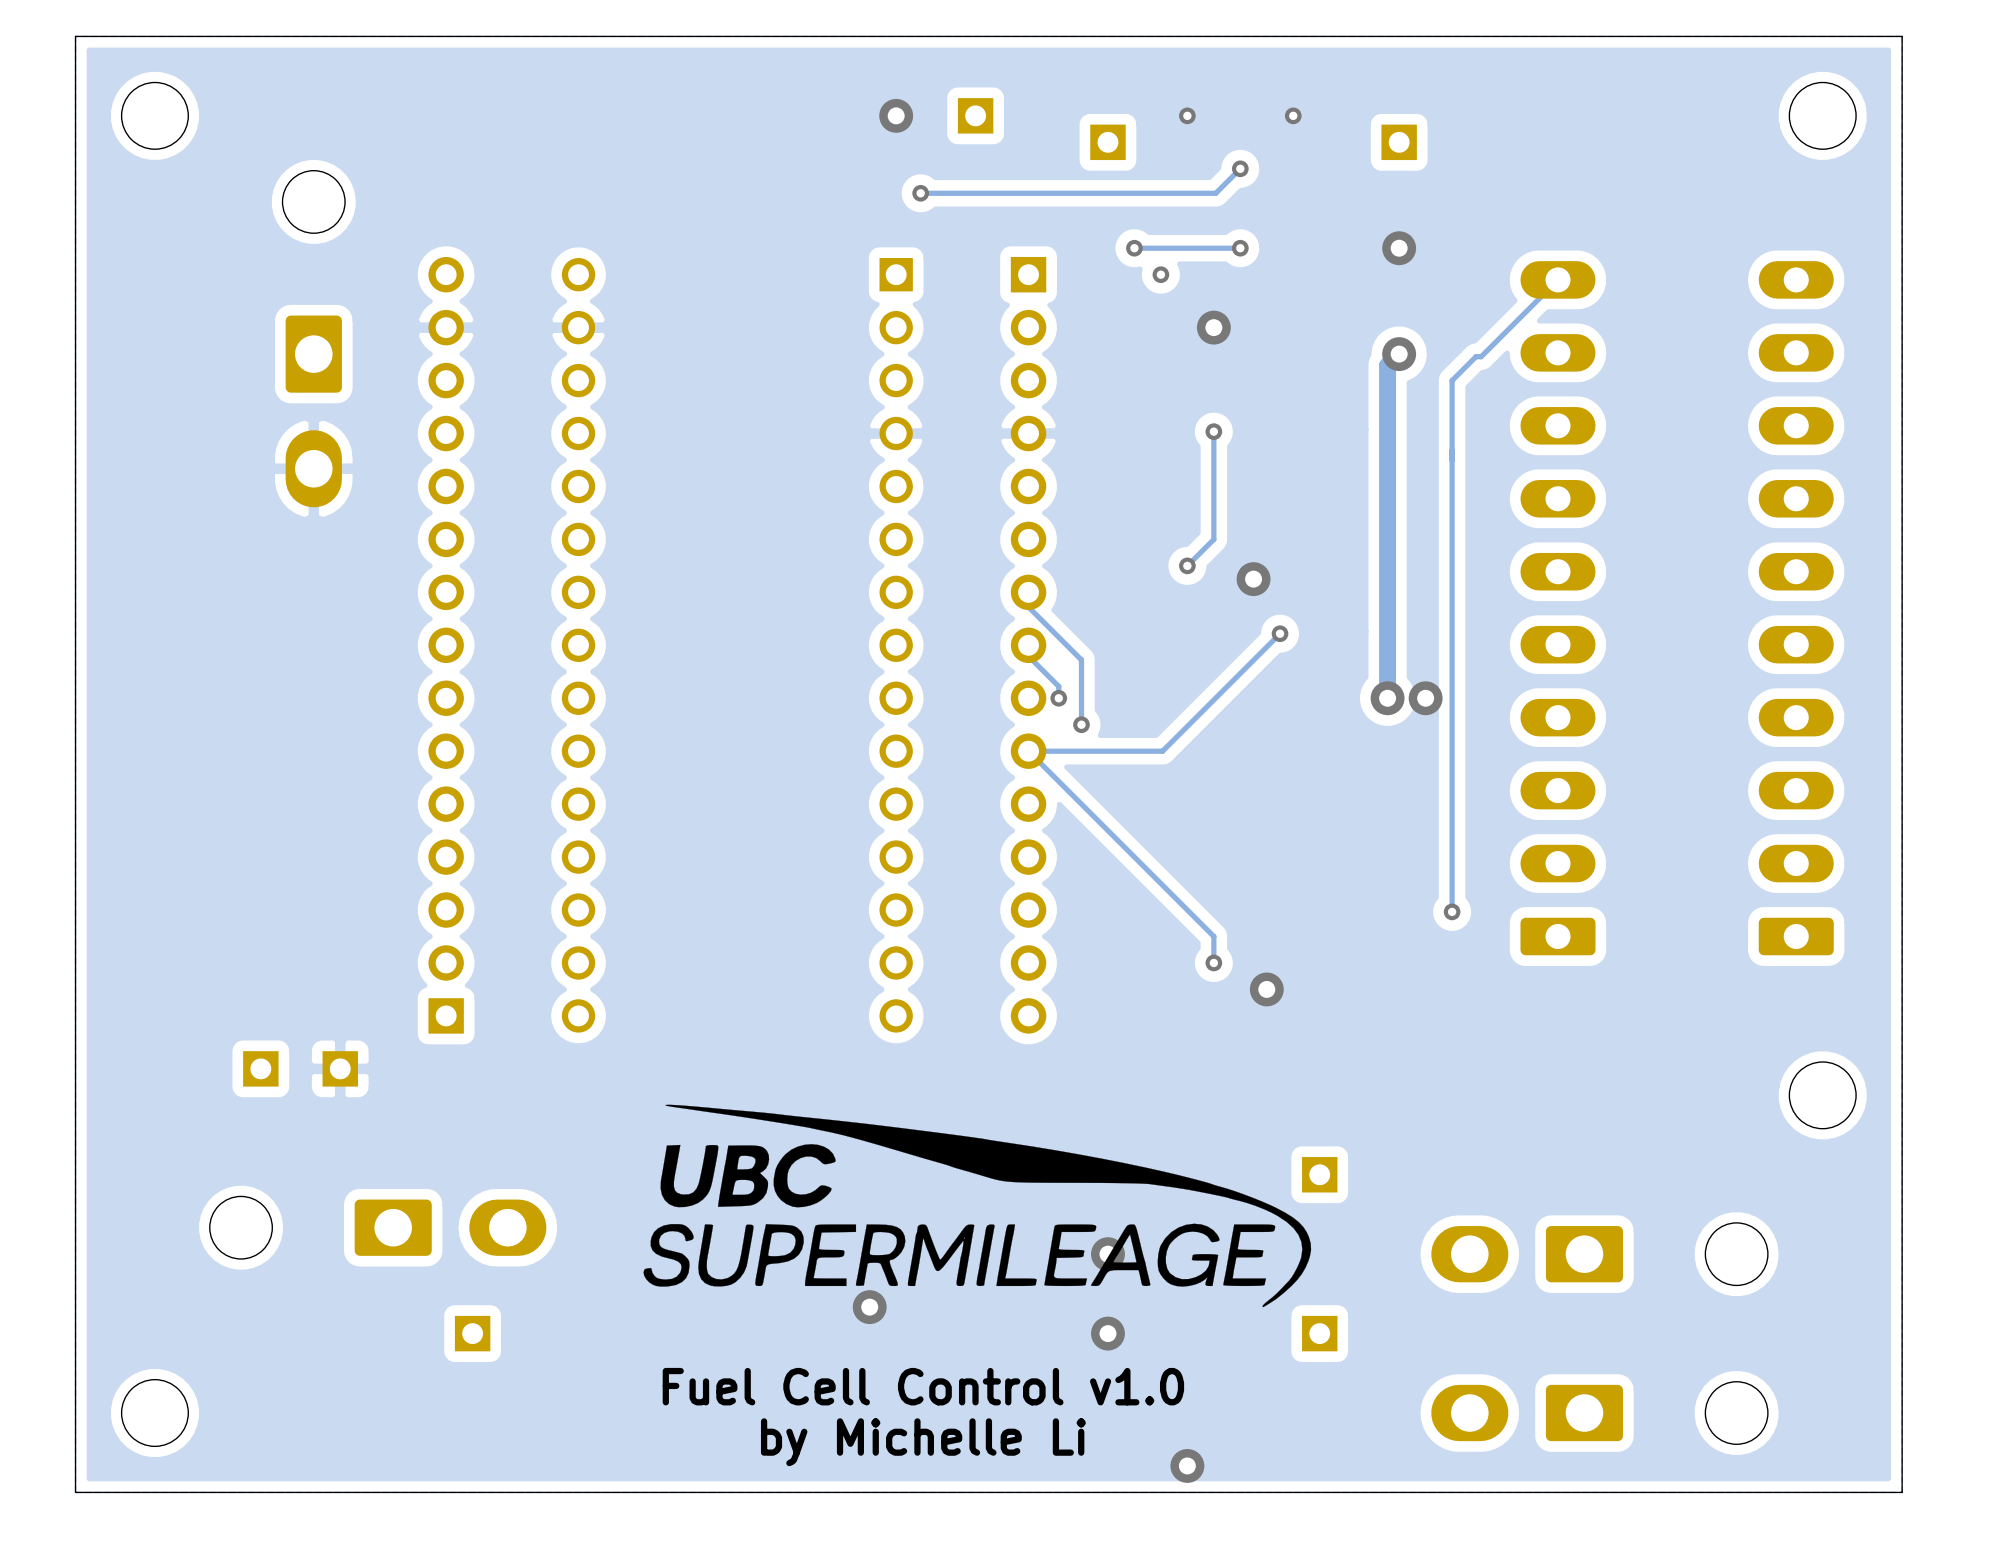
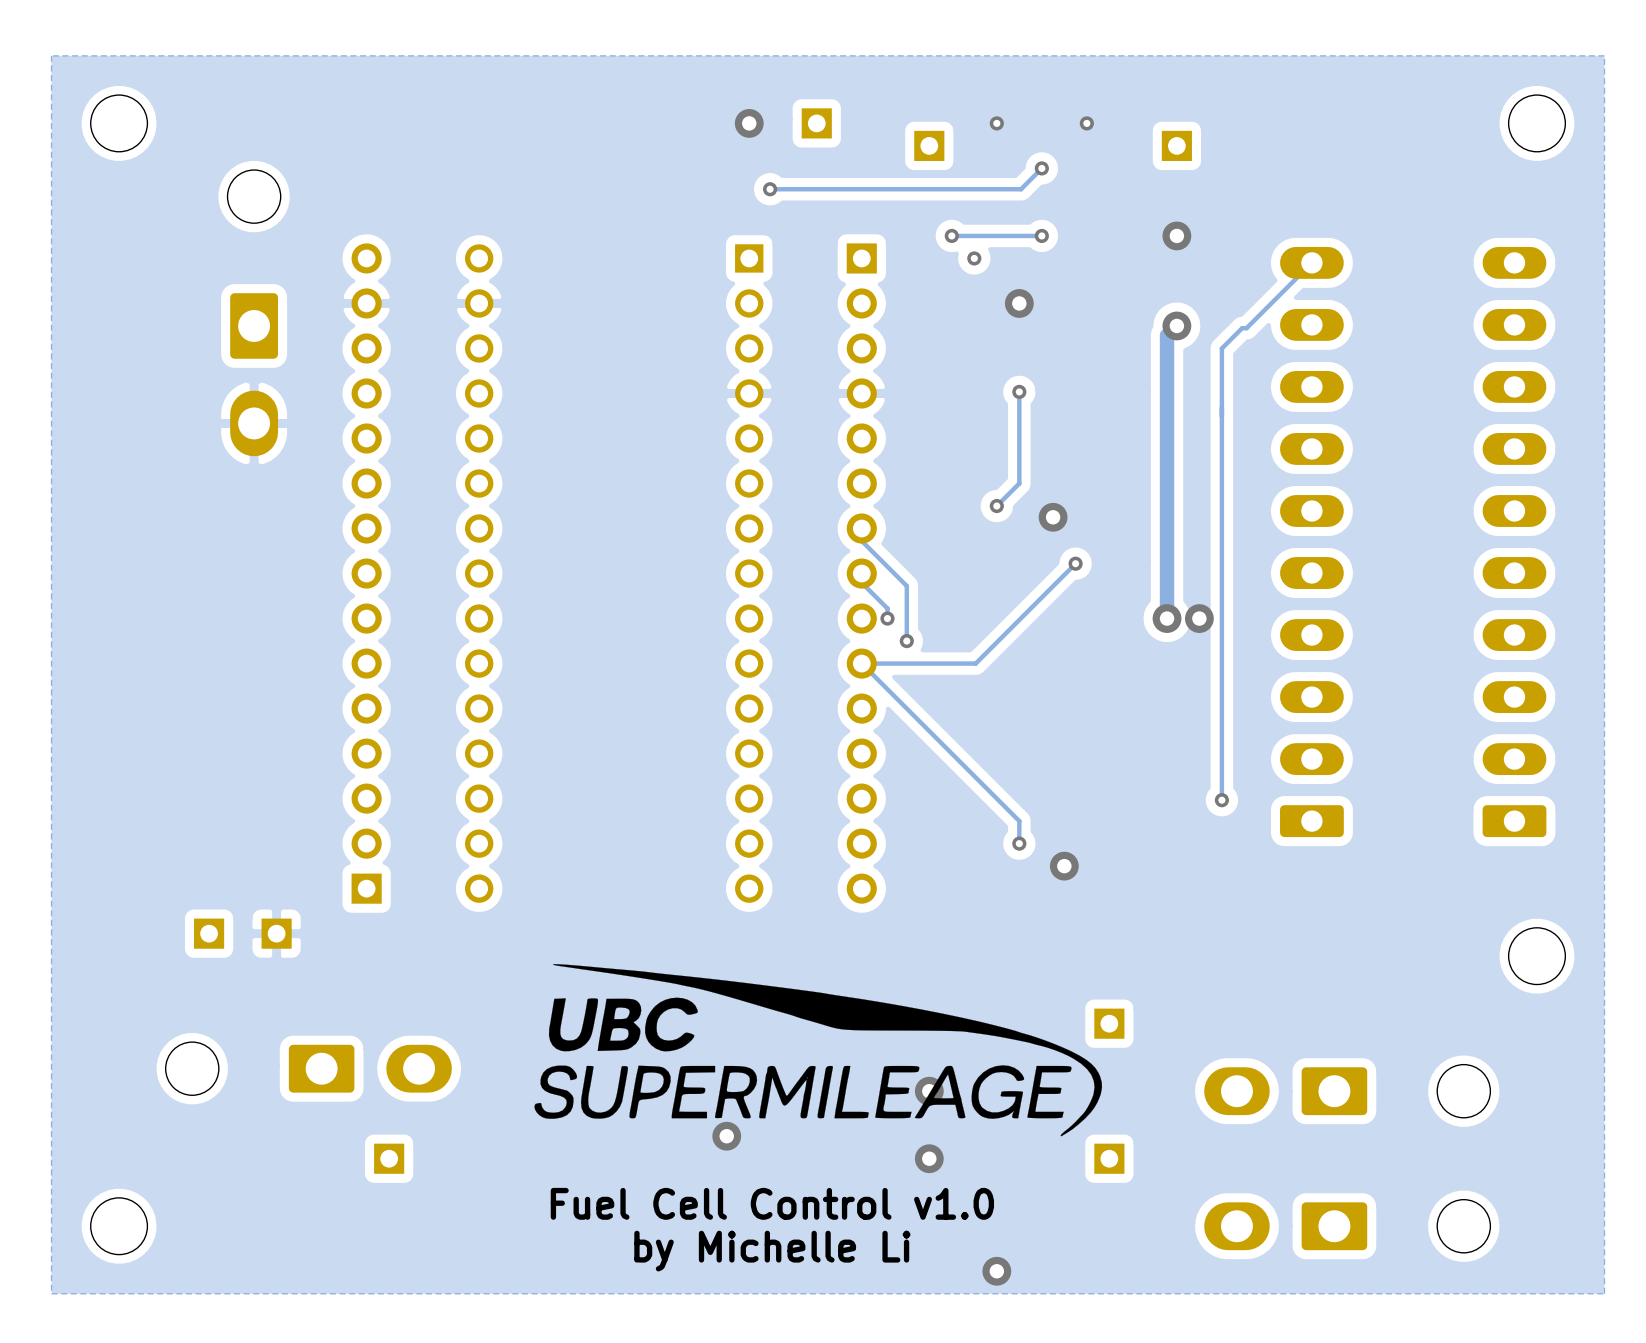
board edge: (1902, 36) (1902, 1492) (75, 1492) (75, 36) (1902, 36) -> none

